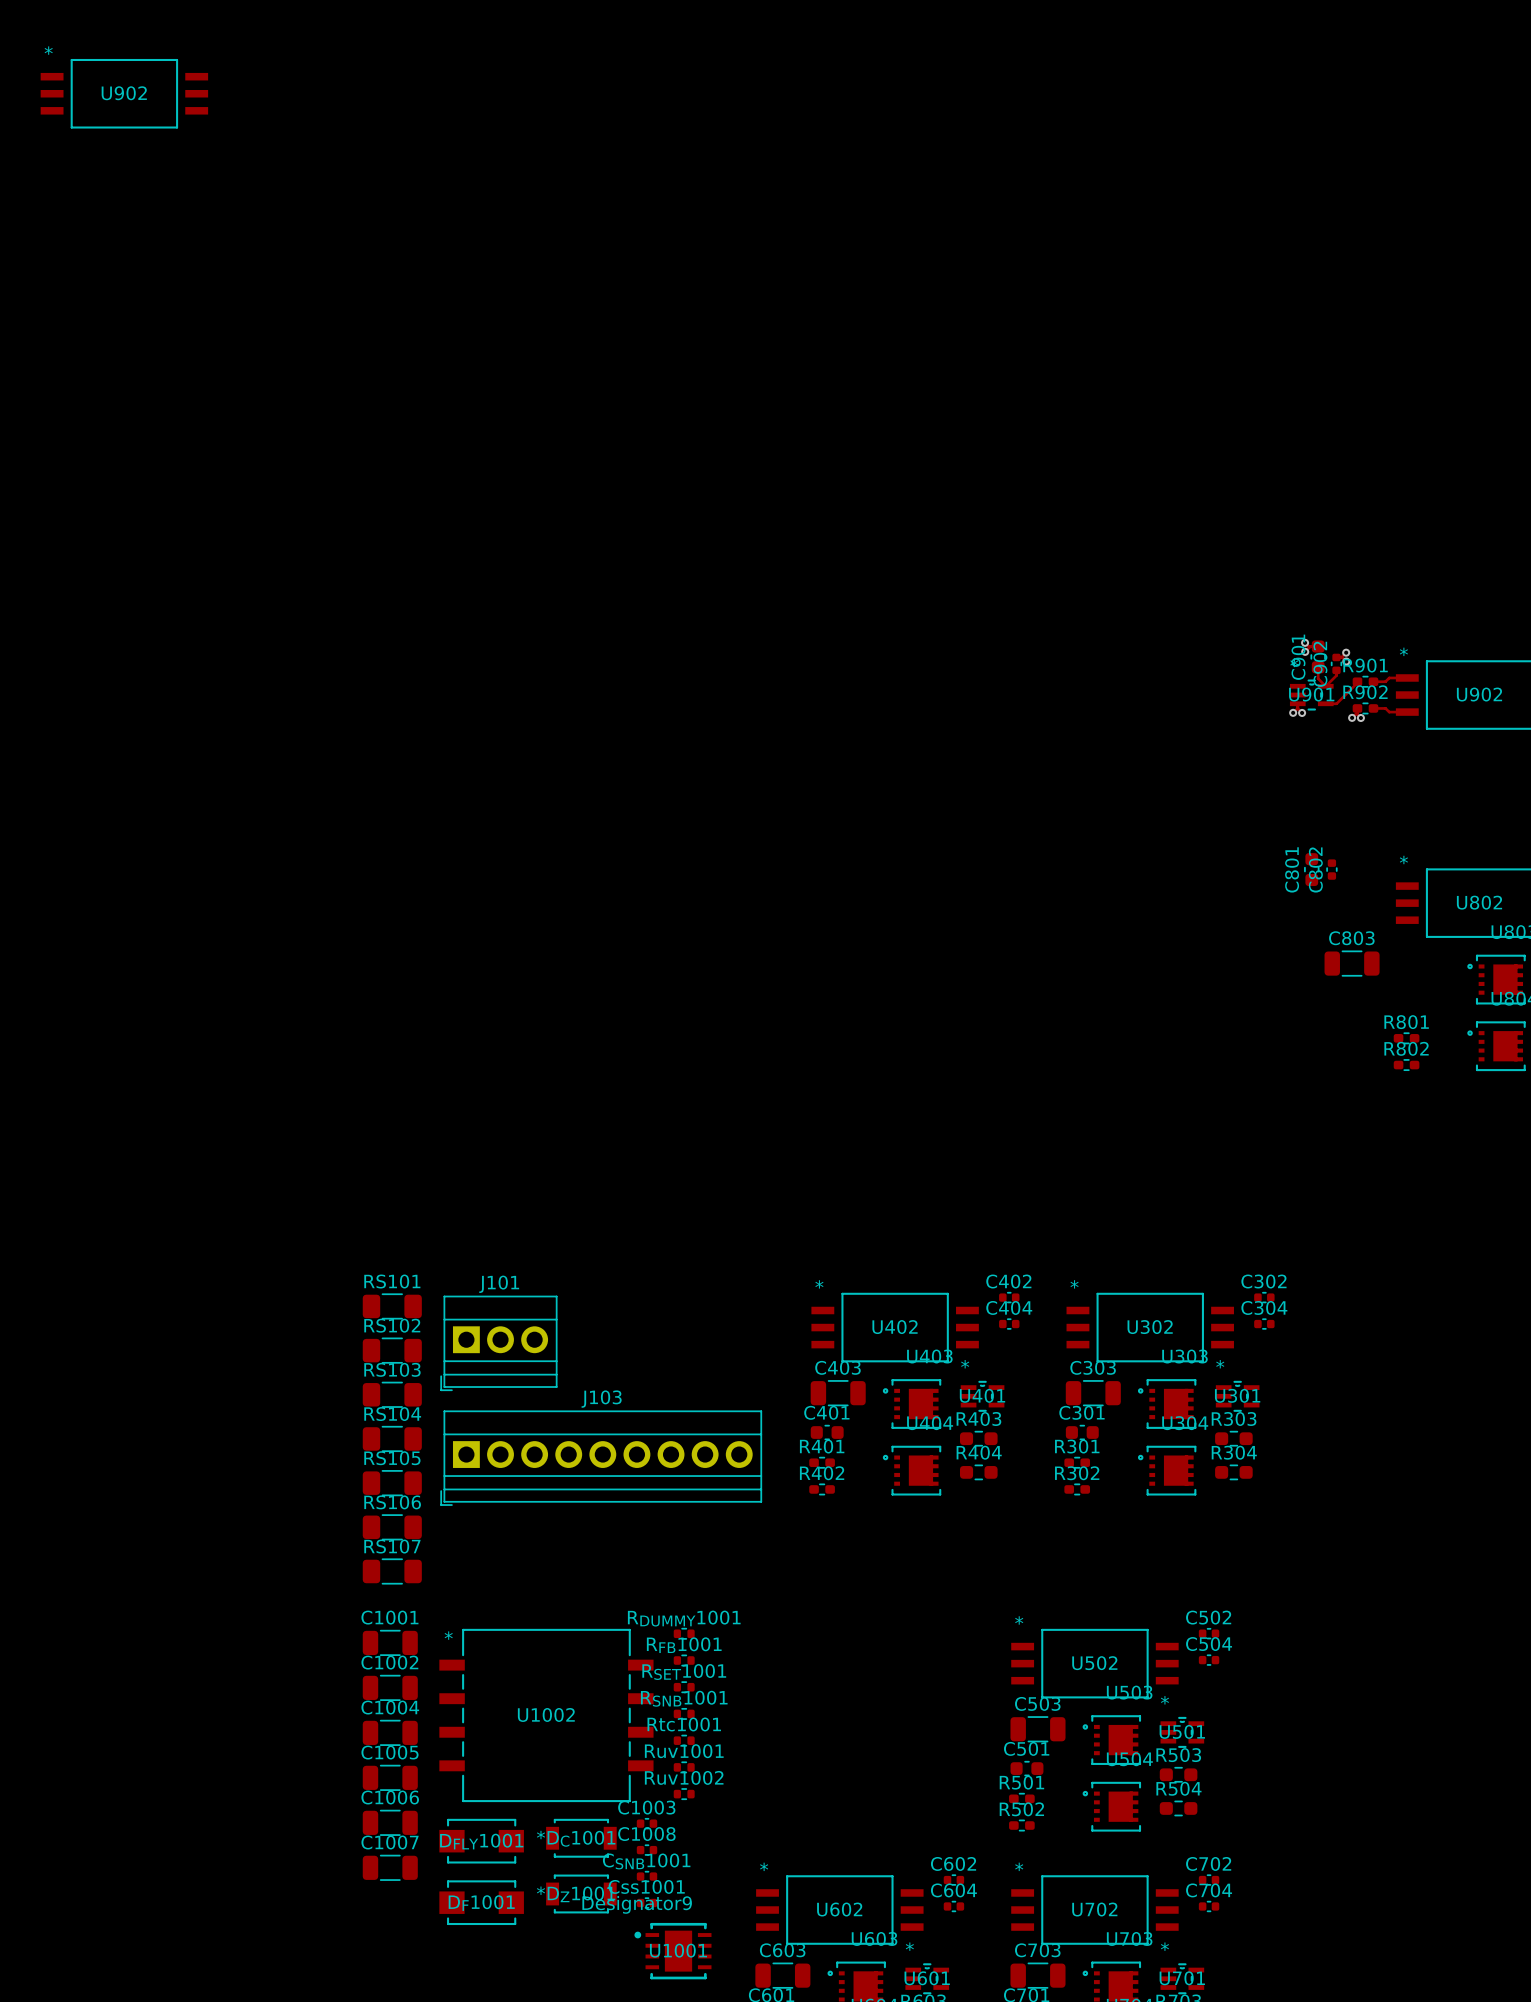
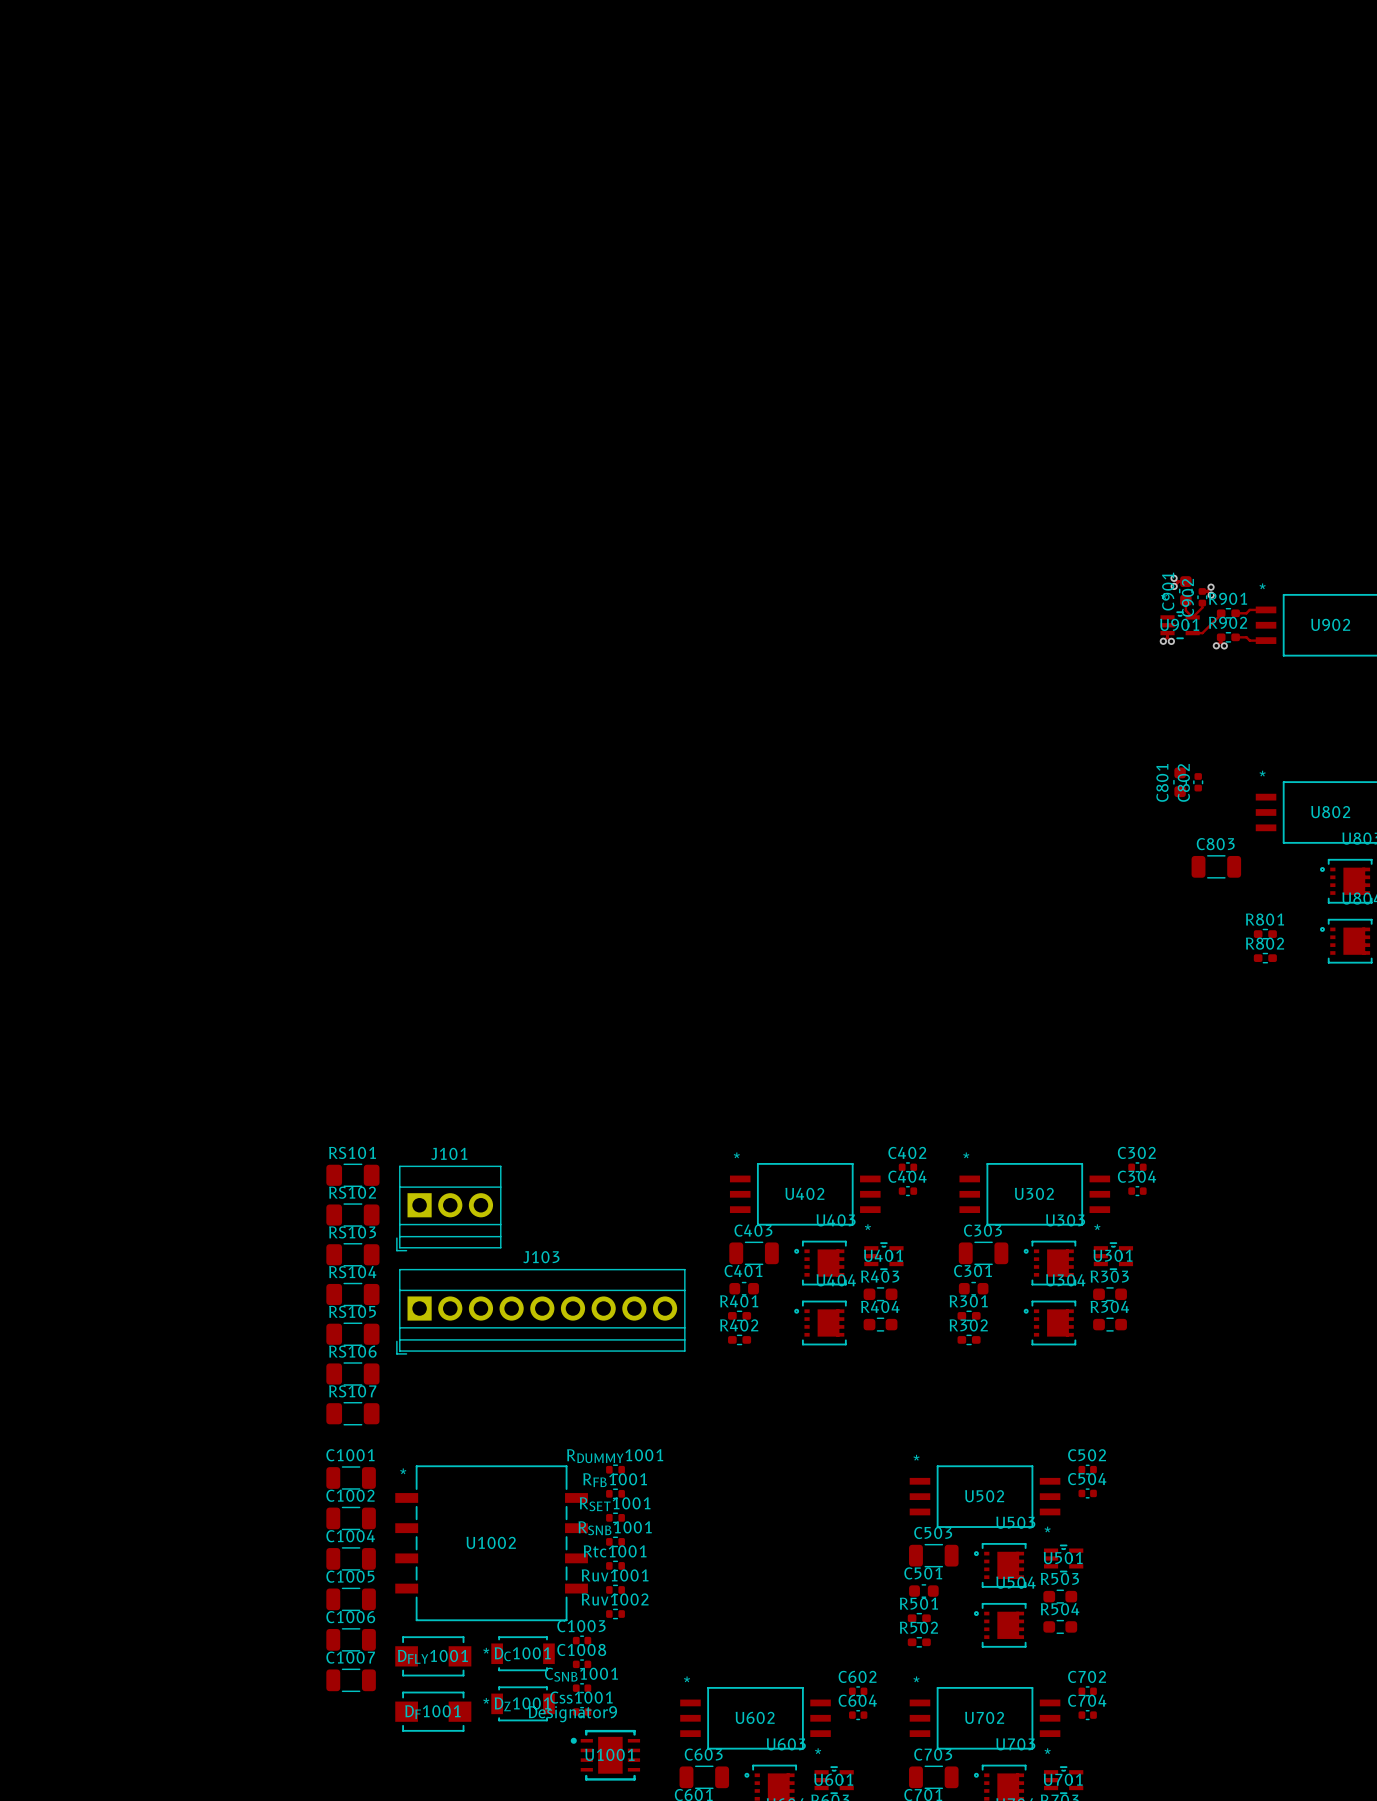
U902: (124, 93) -> none

